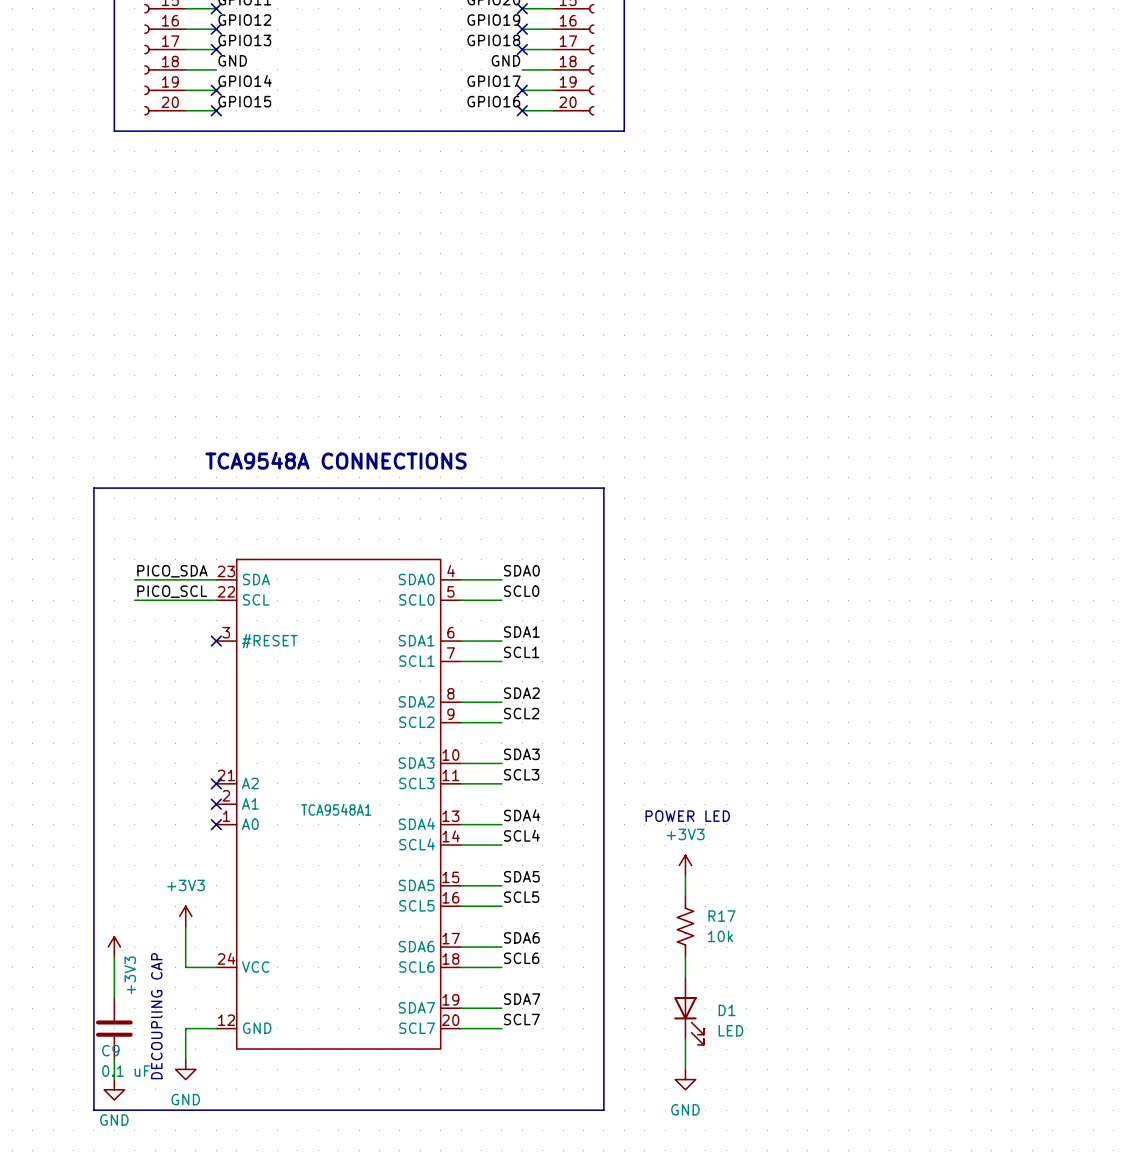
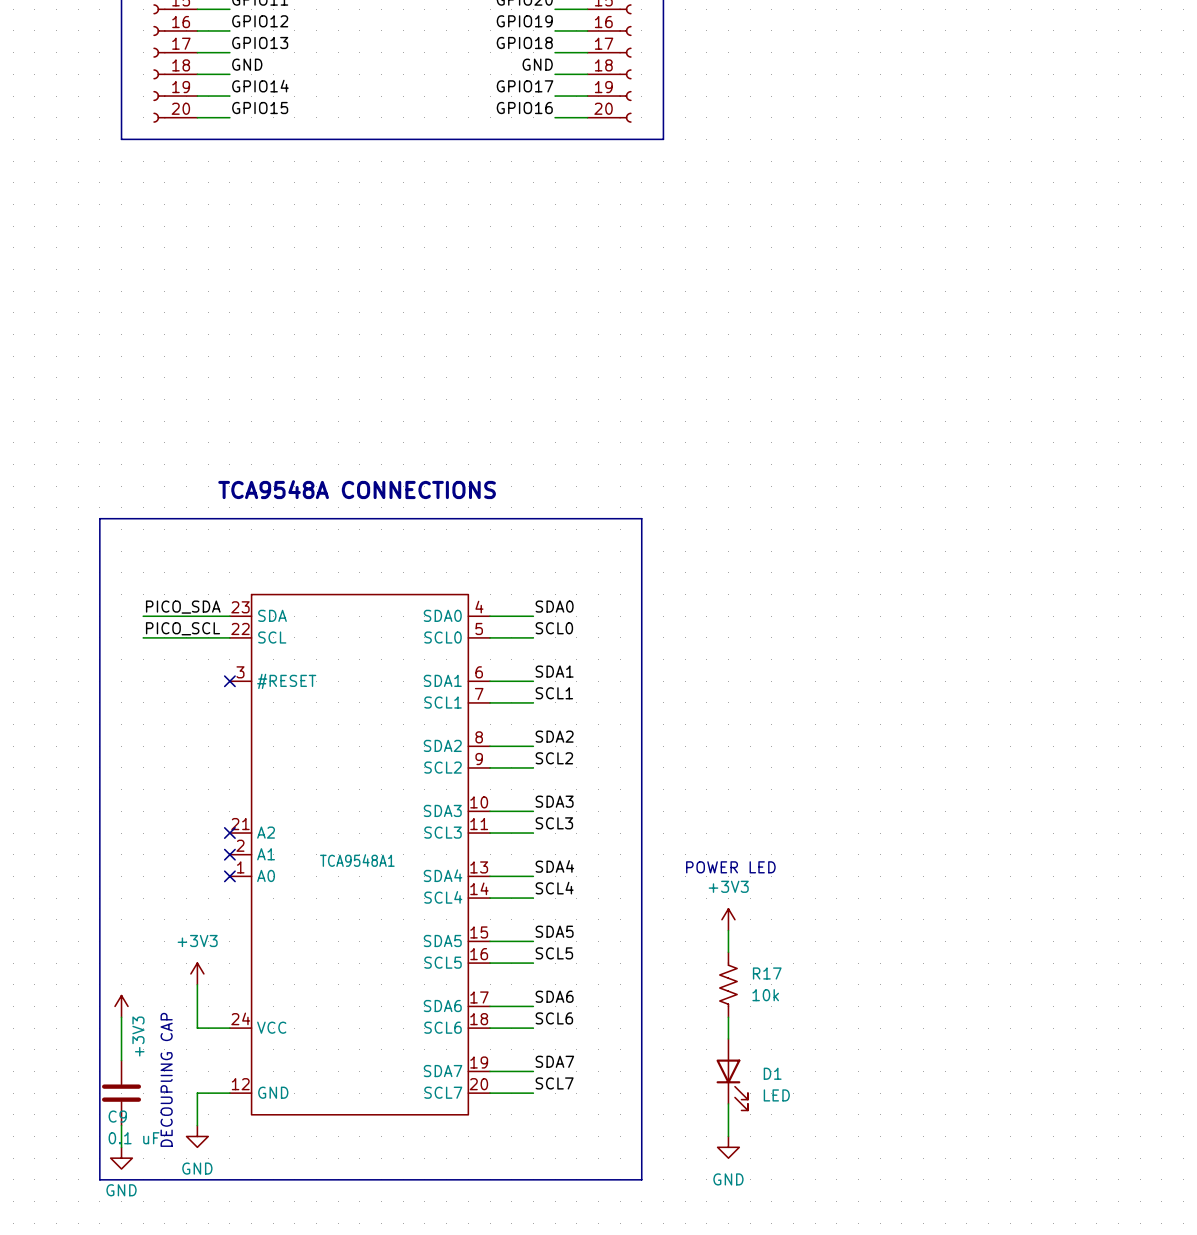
no-connect mark: (216, 8) -> none
no-connect mark: (522, 8) -> none
no-connect mark: (216, 29) -> none
no-connect mark: (522, 29) -> none
no-connect mark: (216, 49) -> none
no-connect mark: (522, 49) -> none
no-connect mark: (216, 90) -> none
no-connect mark: (522, 90) -> none
no-connect mark: (216, 110) -> none
no-connect mark: (522, 110) -> none

